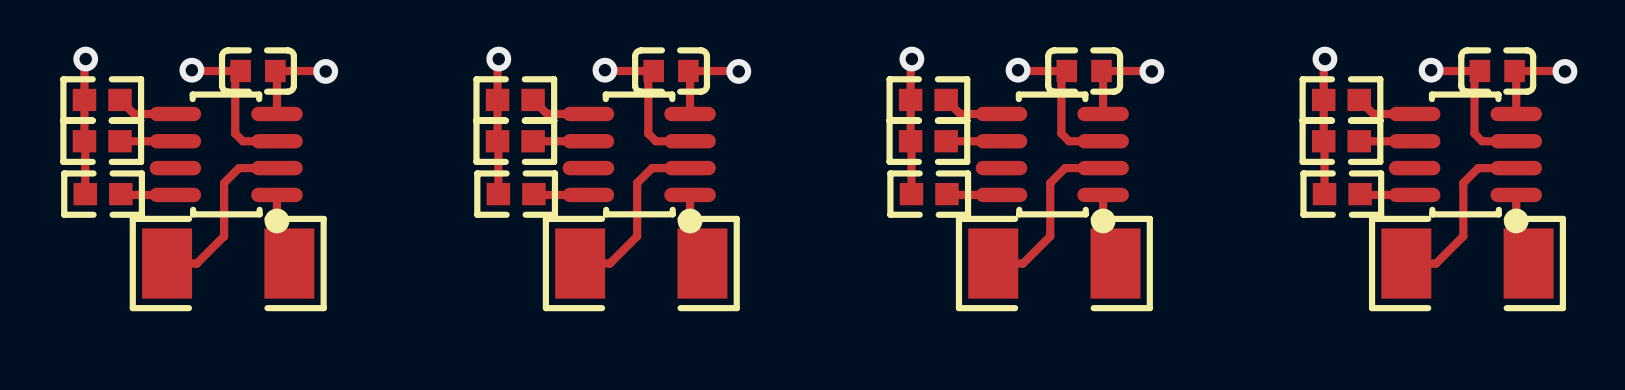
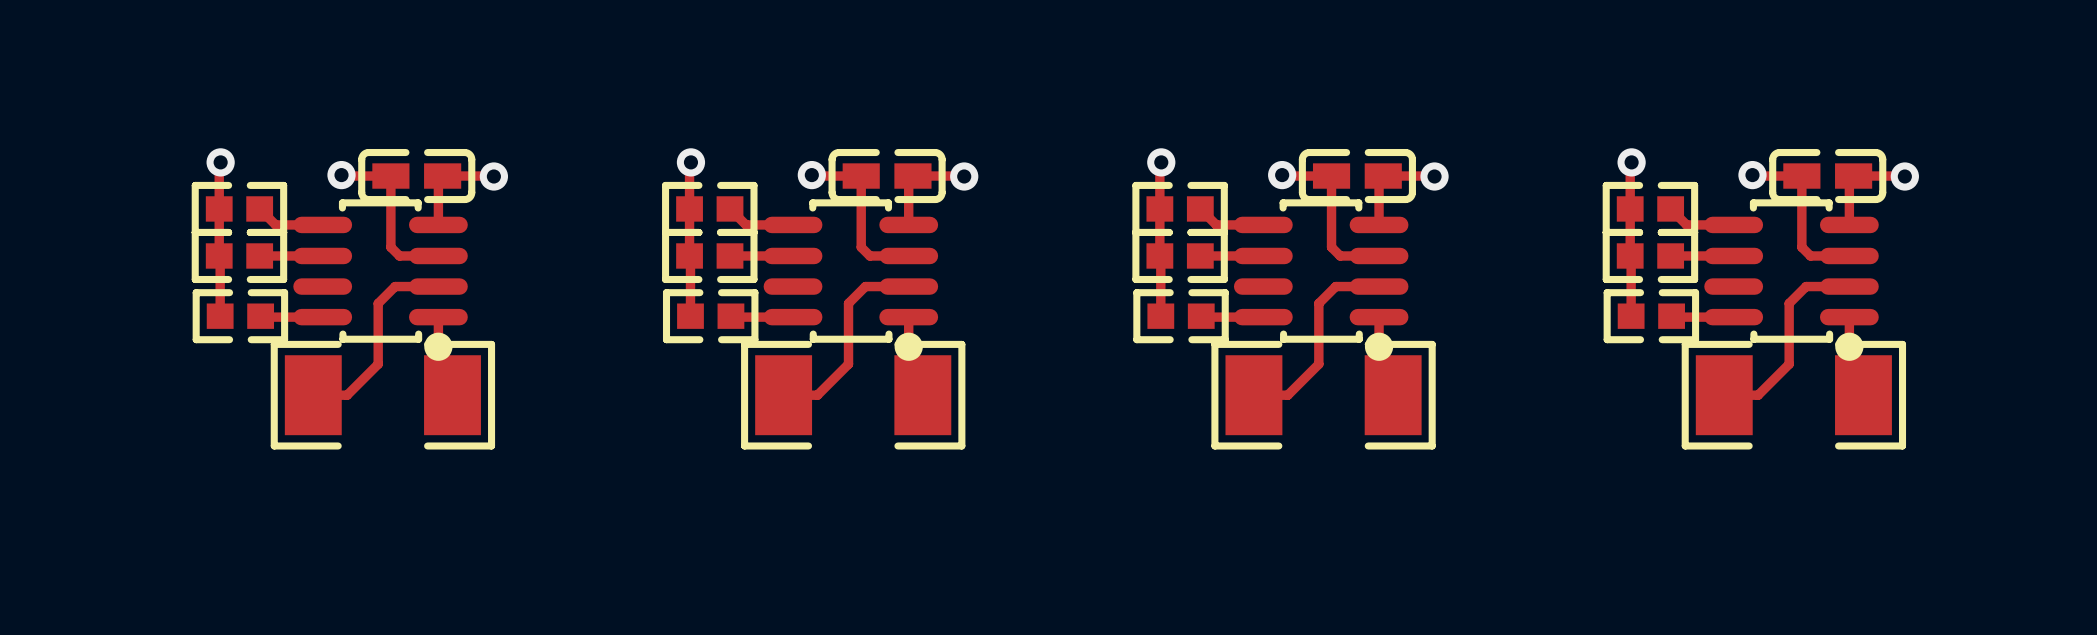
part footprint: [218, 47, 298, 95] -> [358, 148, 476, 204]
part footprint: [632, 47, 711, 95] -> [828, 148, 946, 204]
part footprint: [1045, 47, 1124, 95] -> [1298, 148, 1416, 204]
part footprint: [1458, 47, 1537, 95] -> [1769, 148, 1887, 204]

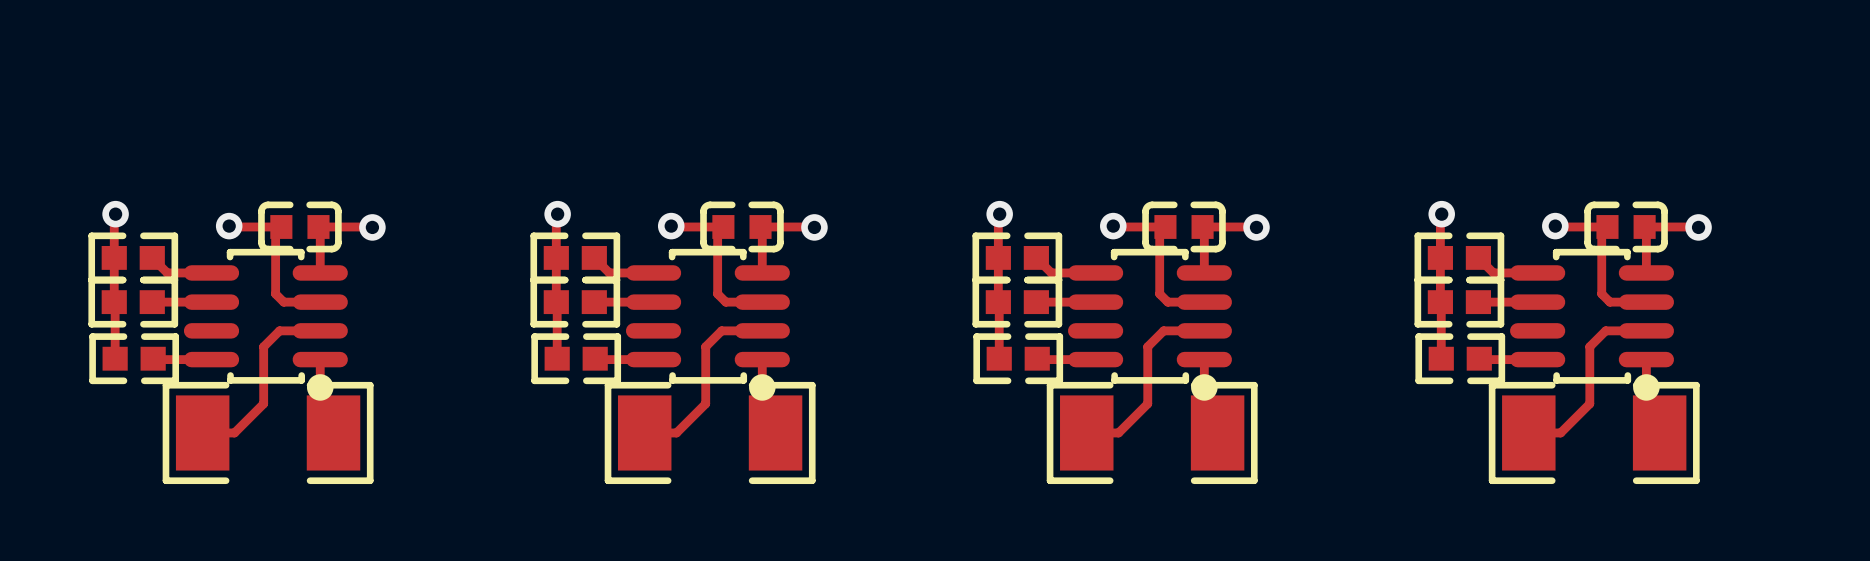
part footprint: [358, 148, 476, 204] -> [258, 201, 342, 253]
part footprint: [828, 148, 946, 204] -> [700, 201, 784, 253]
part footprint: [1298, 148, 1416, 204] -> [1142, 201, 1226, 253]
part footprint: [1769, 148, 1887, 204] -> [1584, 201, 1668, 253]

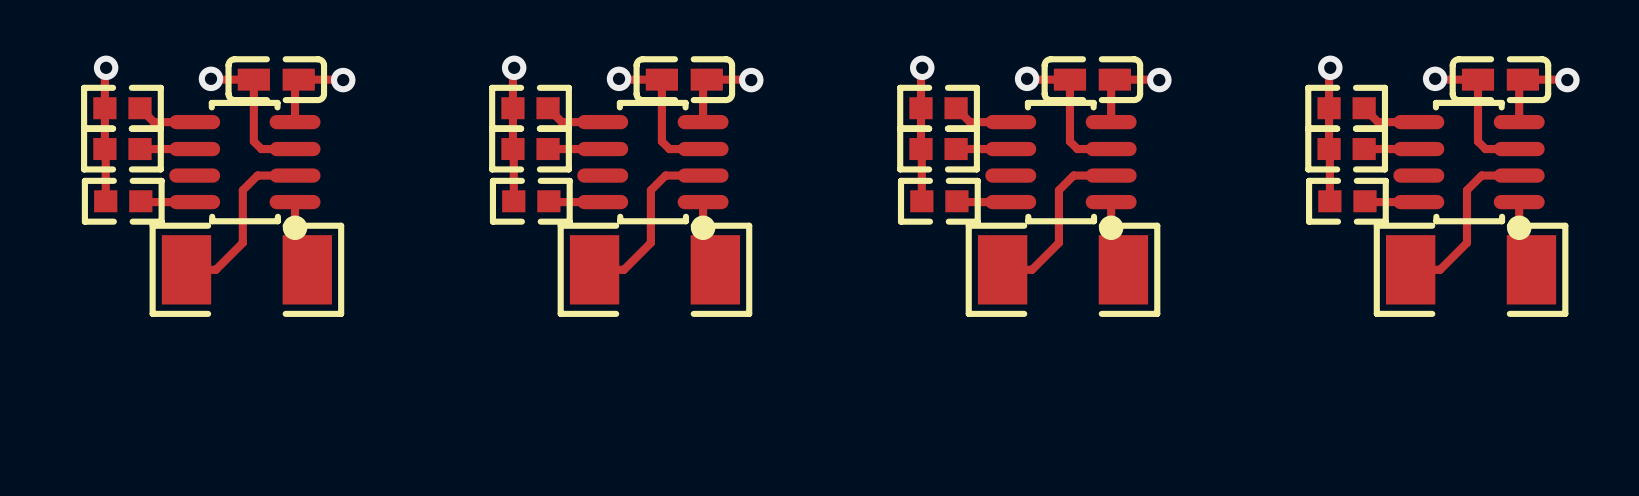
part footprint: [258, 201, 342, 253] -> [225, 56, 328, 104]
part footprint: [700, 201, 784, 253] -> [633, 56, 736, 104]
part footprint: [1142, 201, 1226, 253] -> [1041, 56, 1144, 104]
part footprint: [1584, 201, 1668, 253] -> [1449, 56, 1552, 104]

